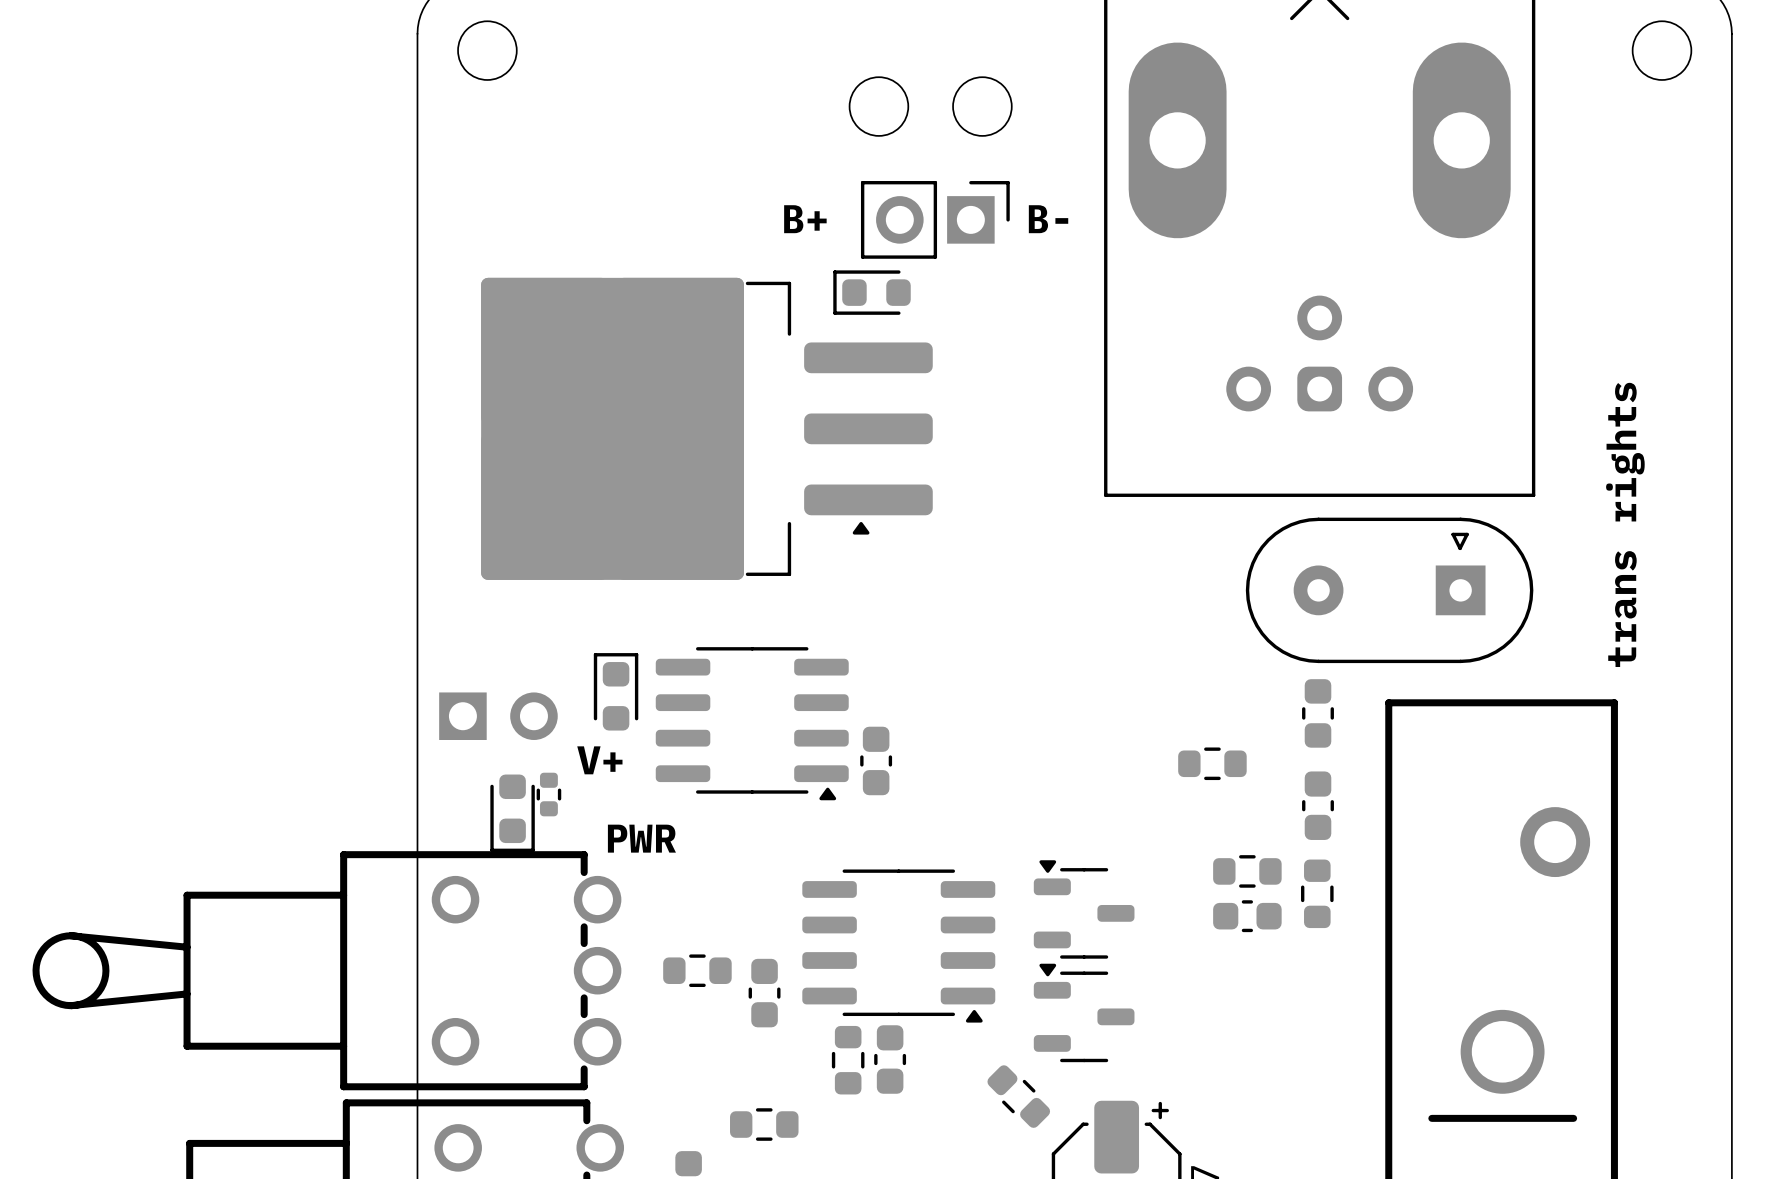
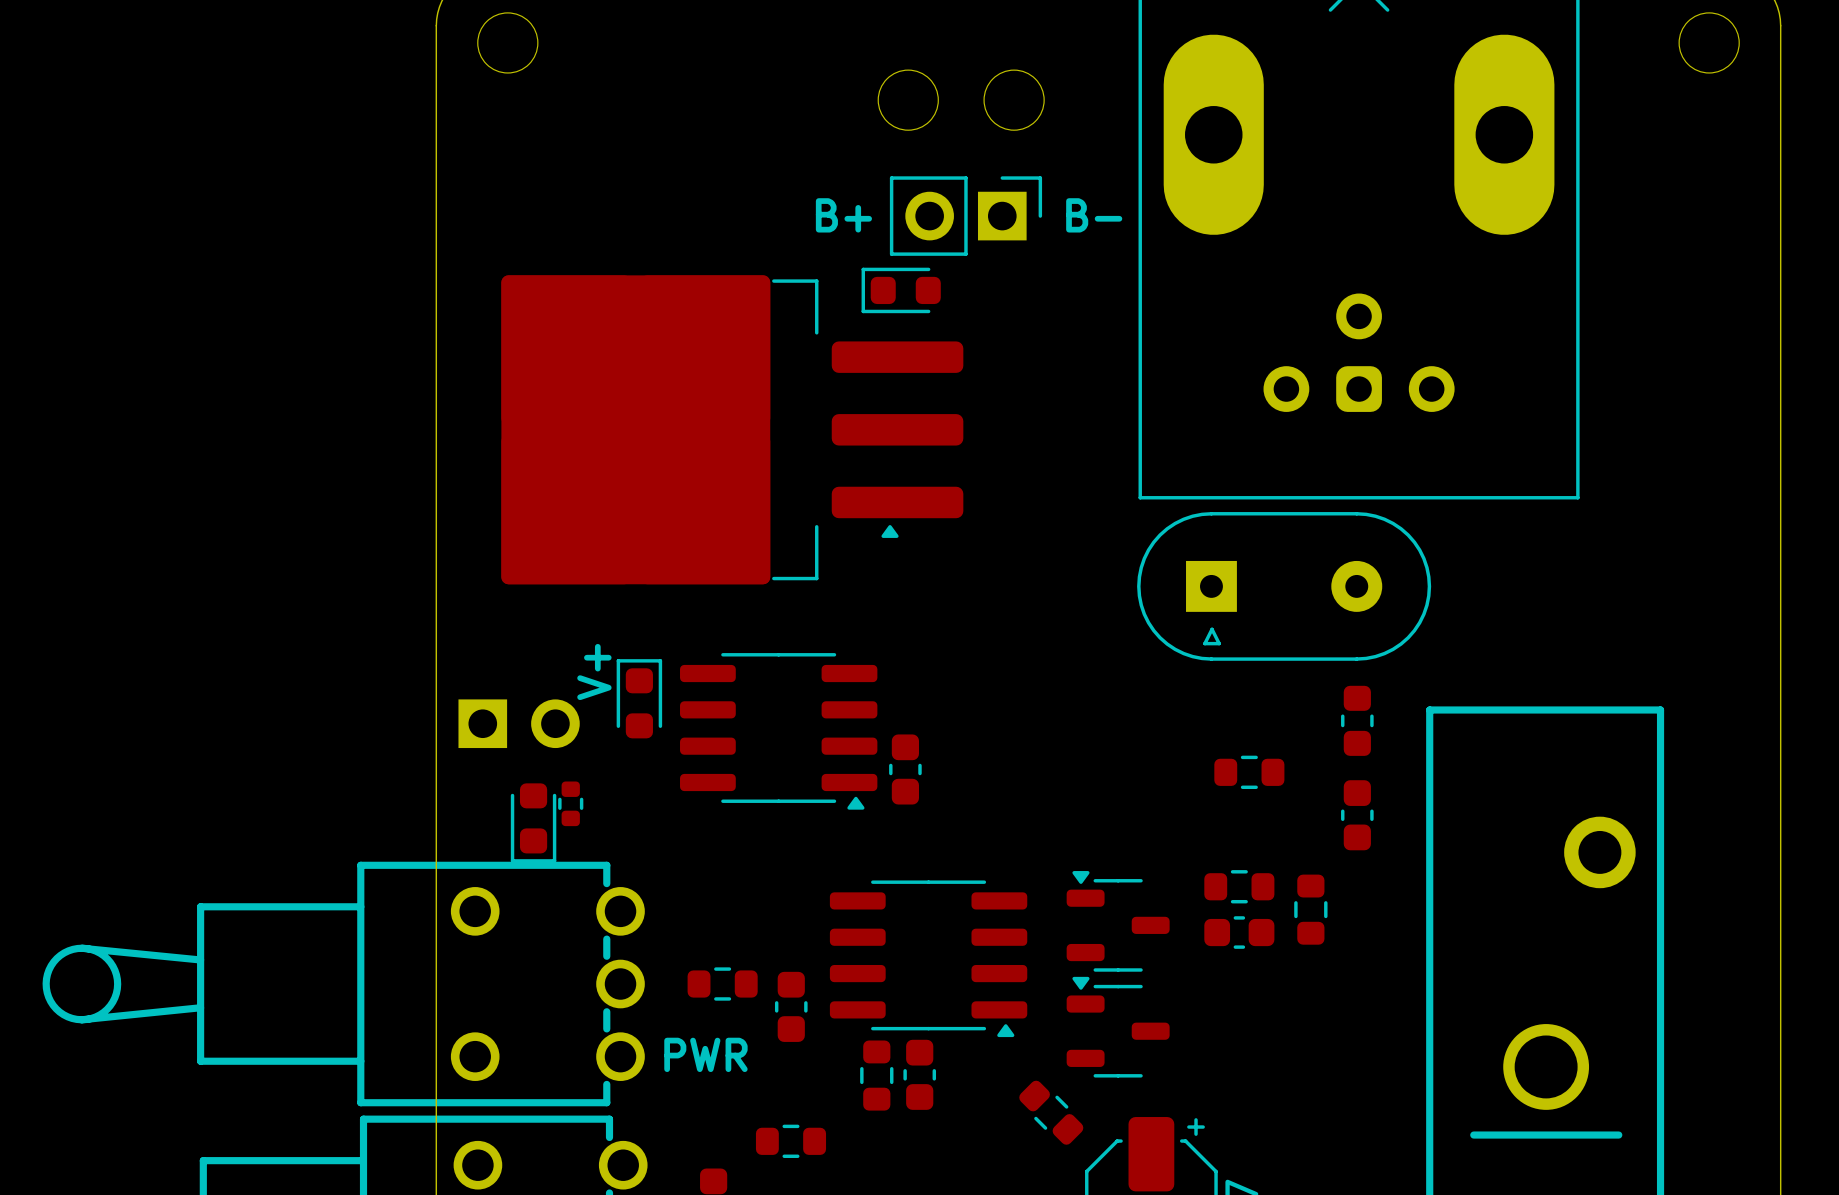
text: trans rights (1625, 524) -> none
part rotation: 0° (1389, 590) -> 180° (1284, 586)
text rotation: 0° (599, 760) -> 90° counterclockwise (594, 672)
text position: V+ (599, 760) -> V+ (594, 672)
text position: PWR (641, 838) -> PWR (705, 1054)
part: (1247, 871) -> none
part: none -> (1239, 886)
part: (1317, 893) -> none
part: none -> (1310, 909)
part position: (1247, 916) -> (1239, 932)

